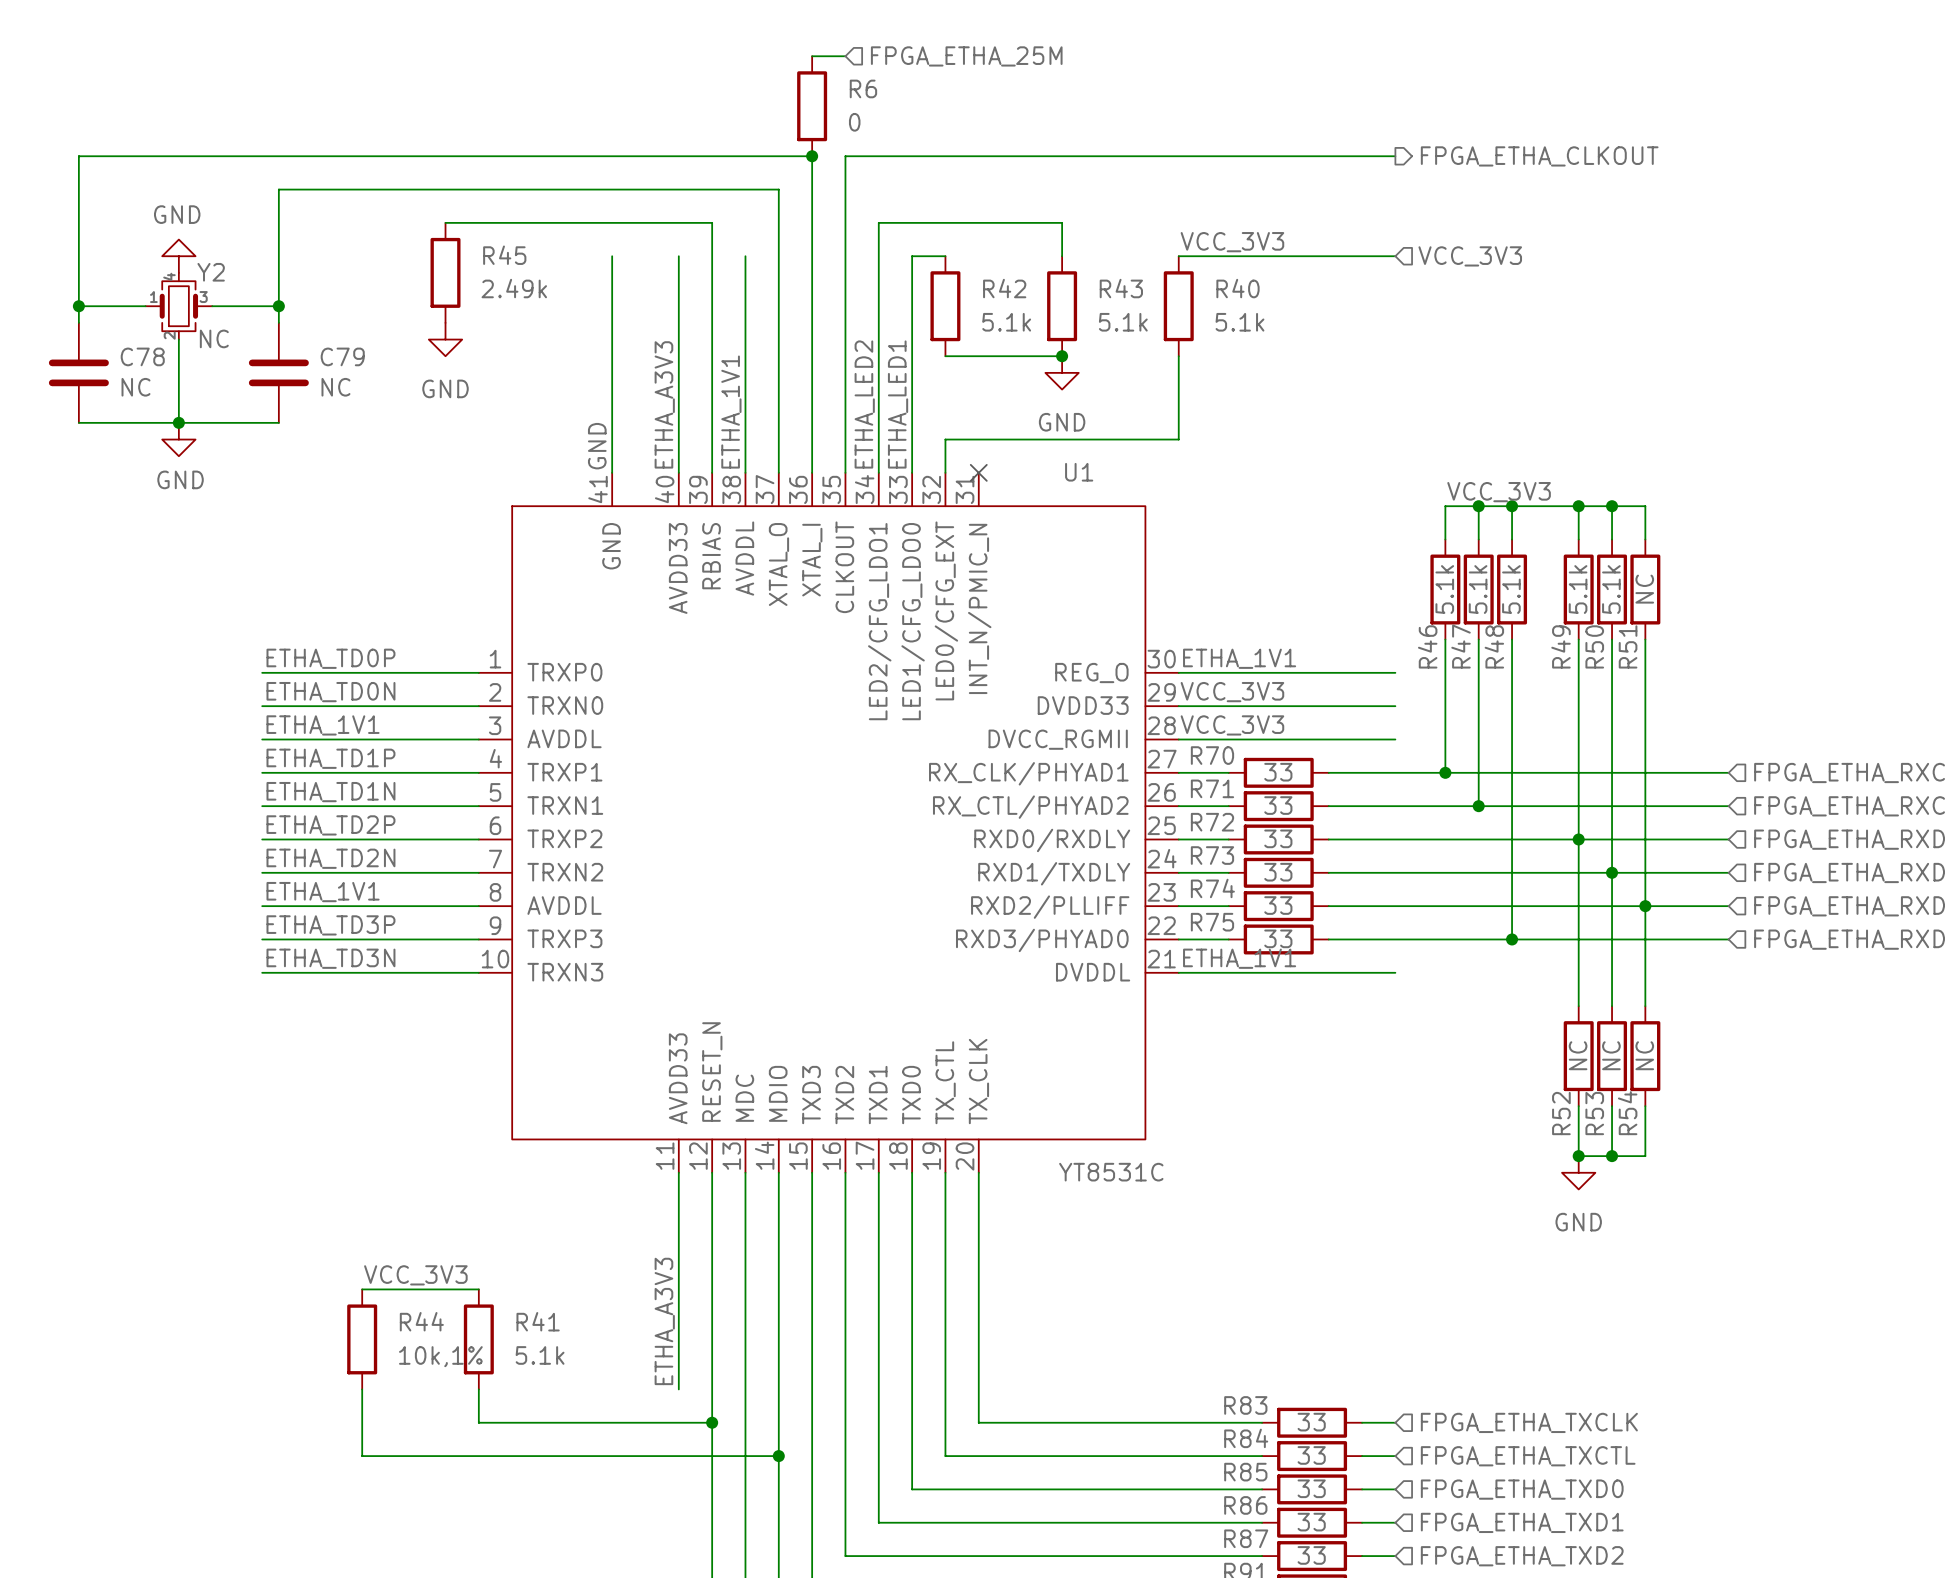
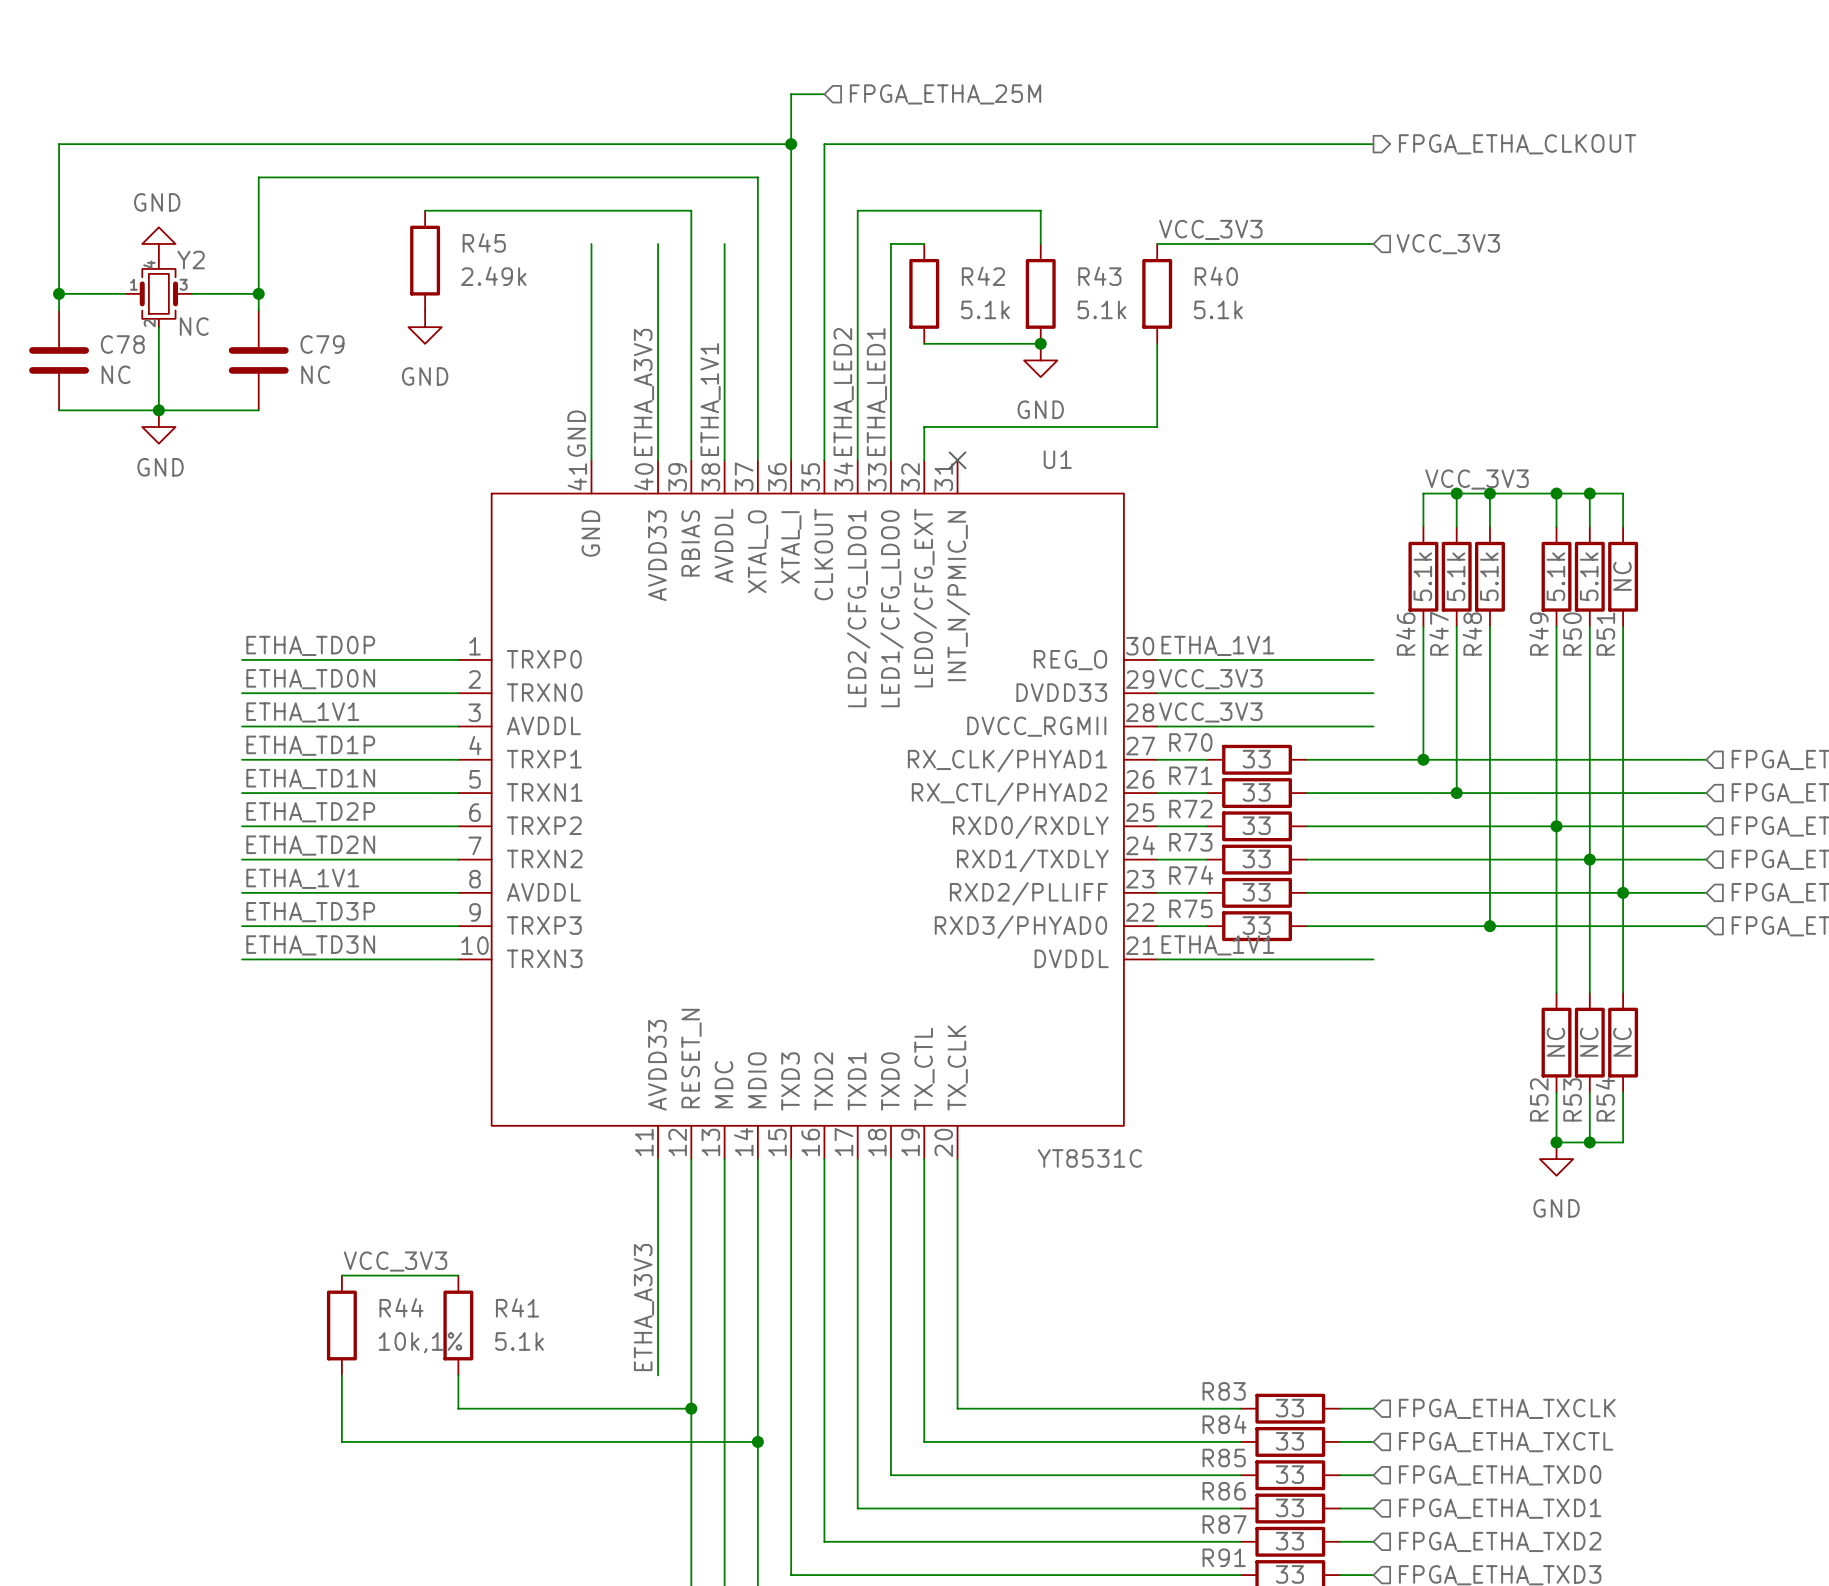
wire: (812, 56) (845, 56) -> none
hierarchical label position: FPGA_ETHA_25M (966, 56) -> FPGA_ETHA_25M (945, 94)
R6: 0 (812, 106) -> none
wire: none -> (824, 94) (791, 94) (791, 144)

